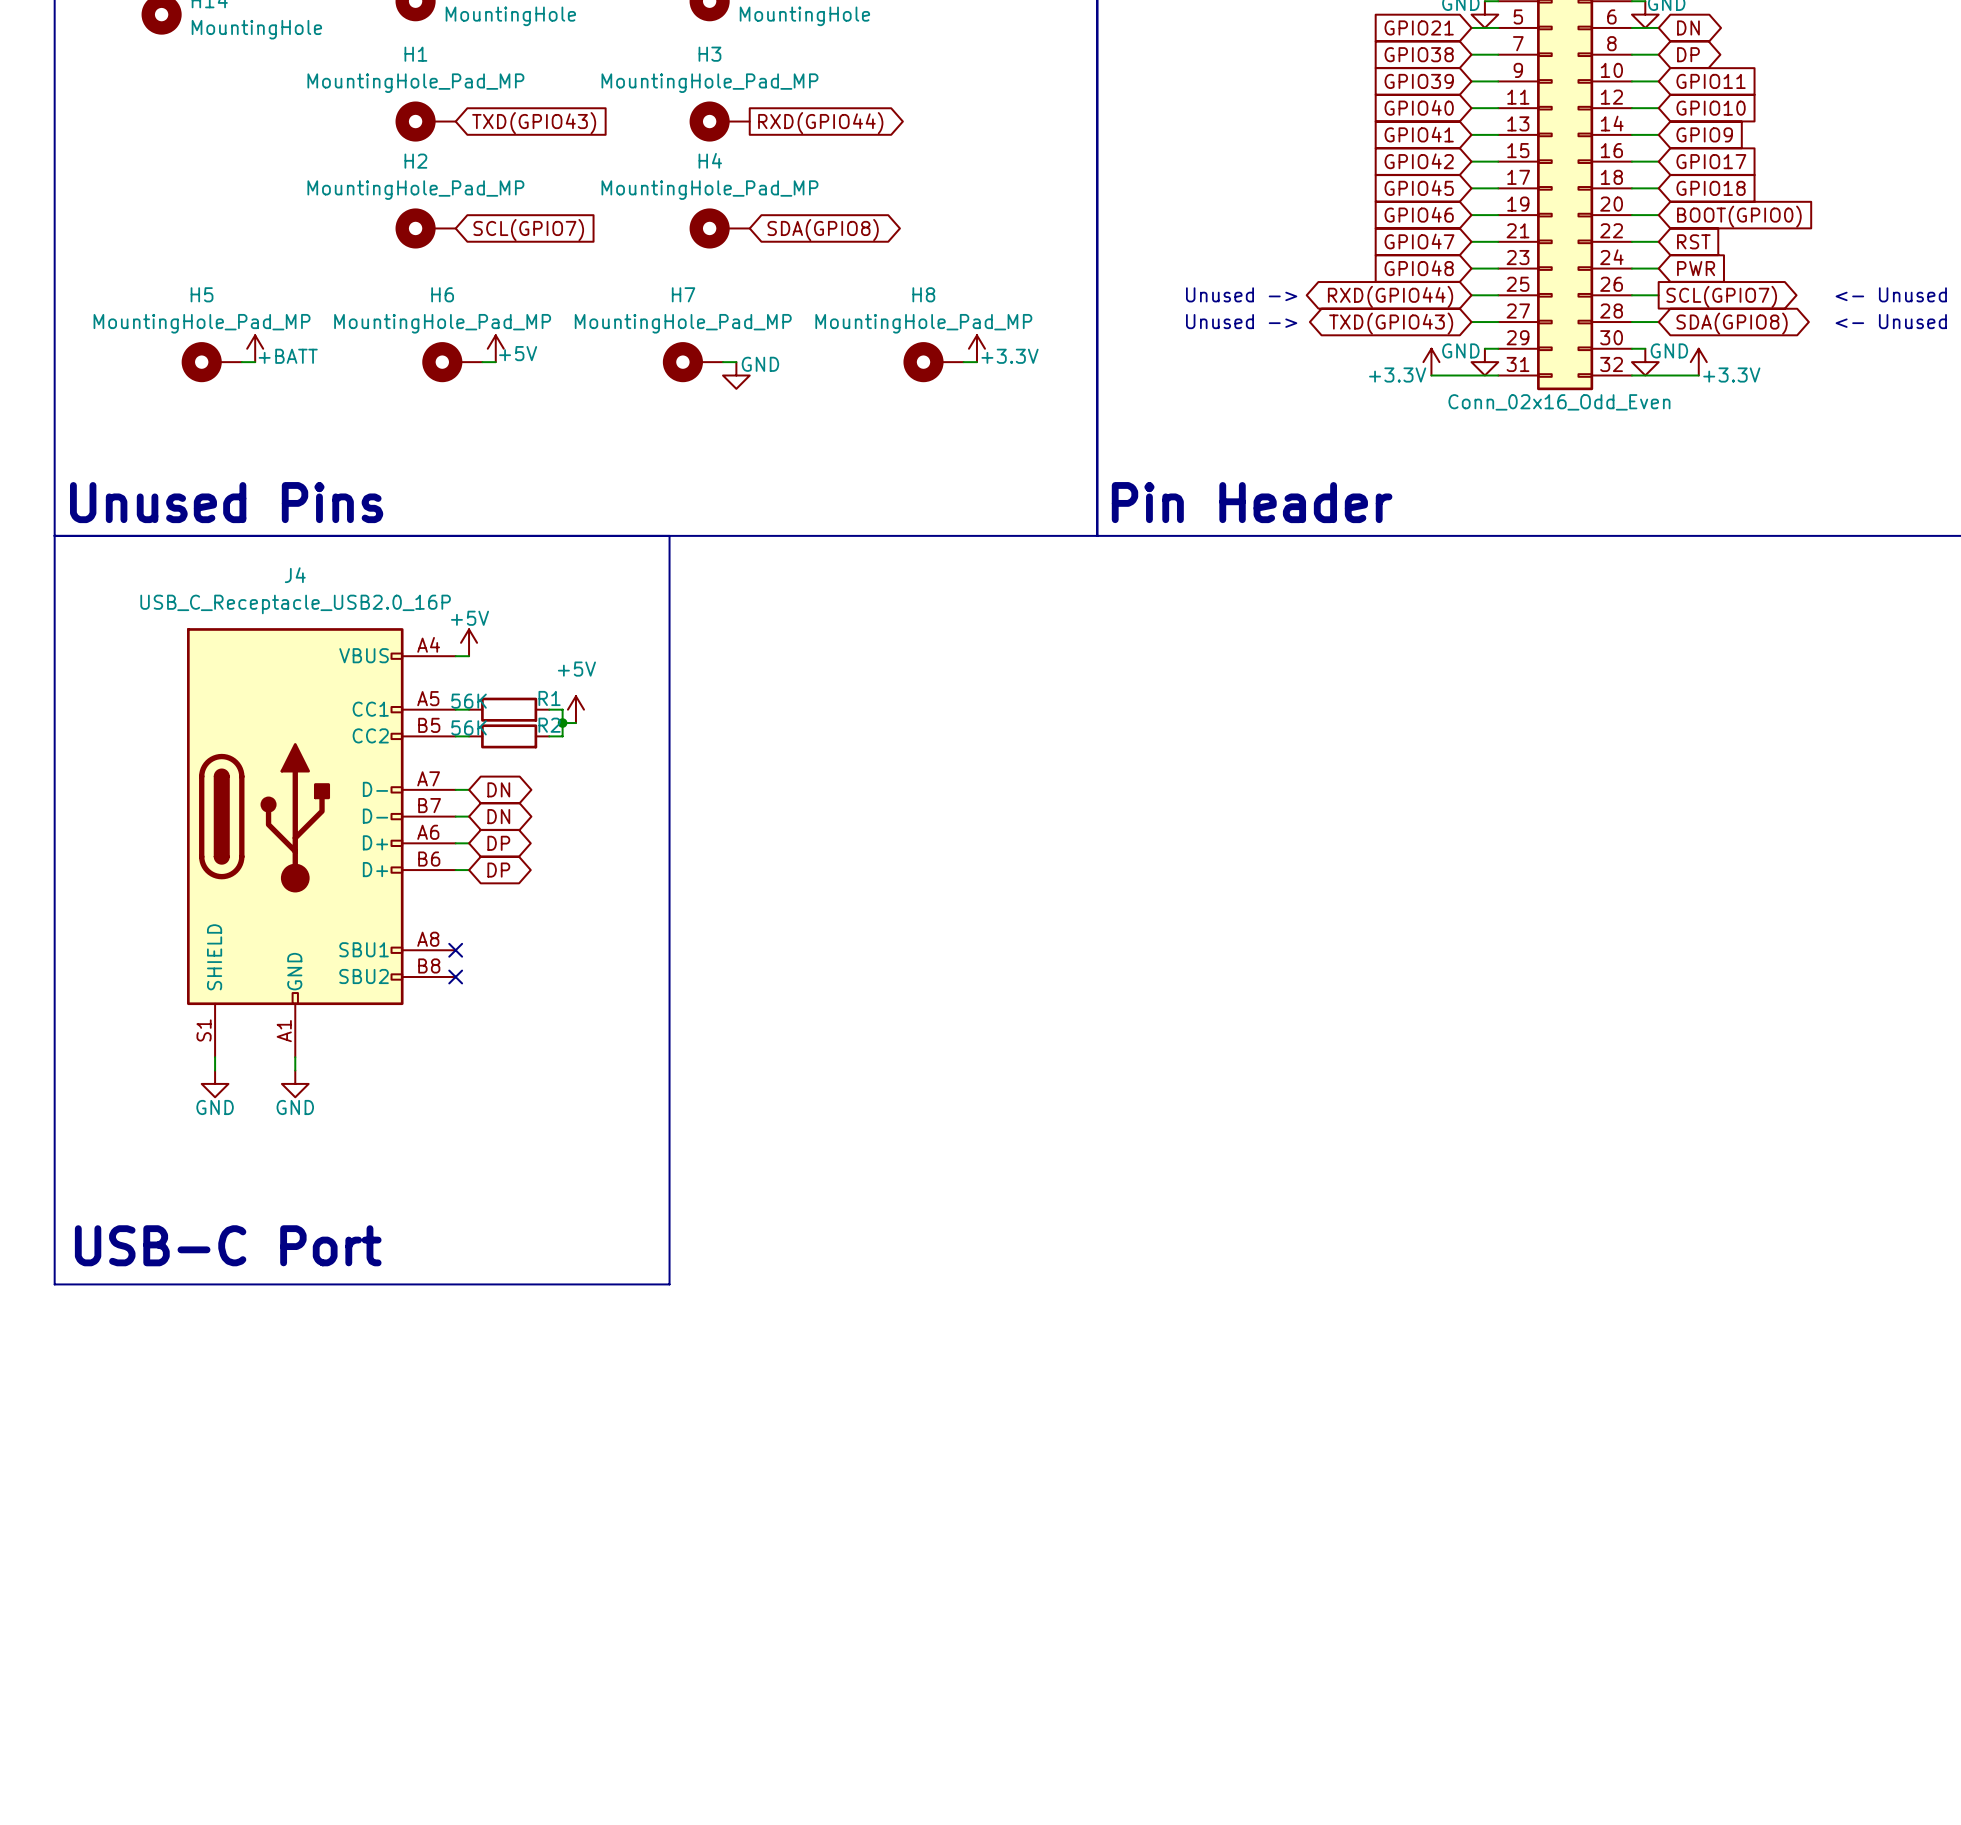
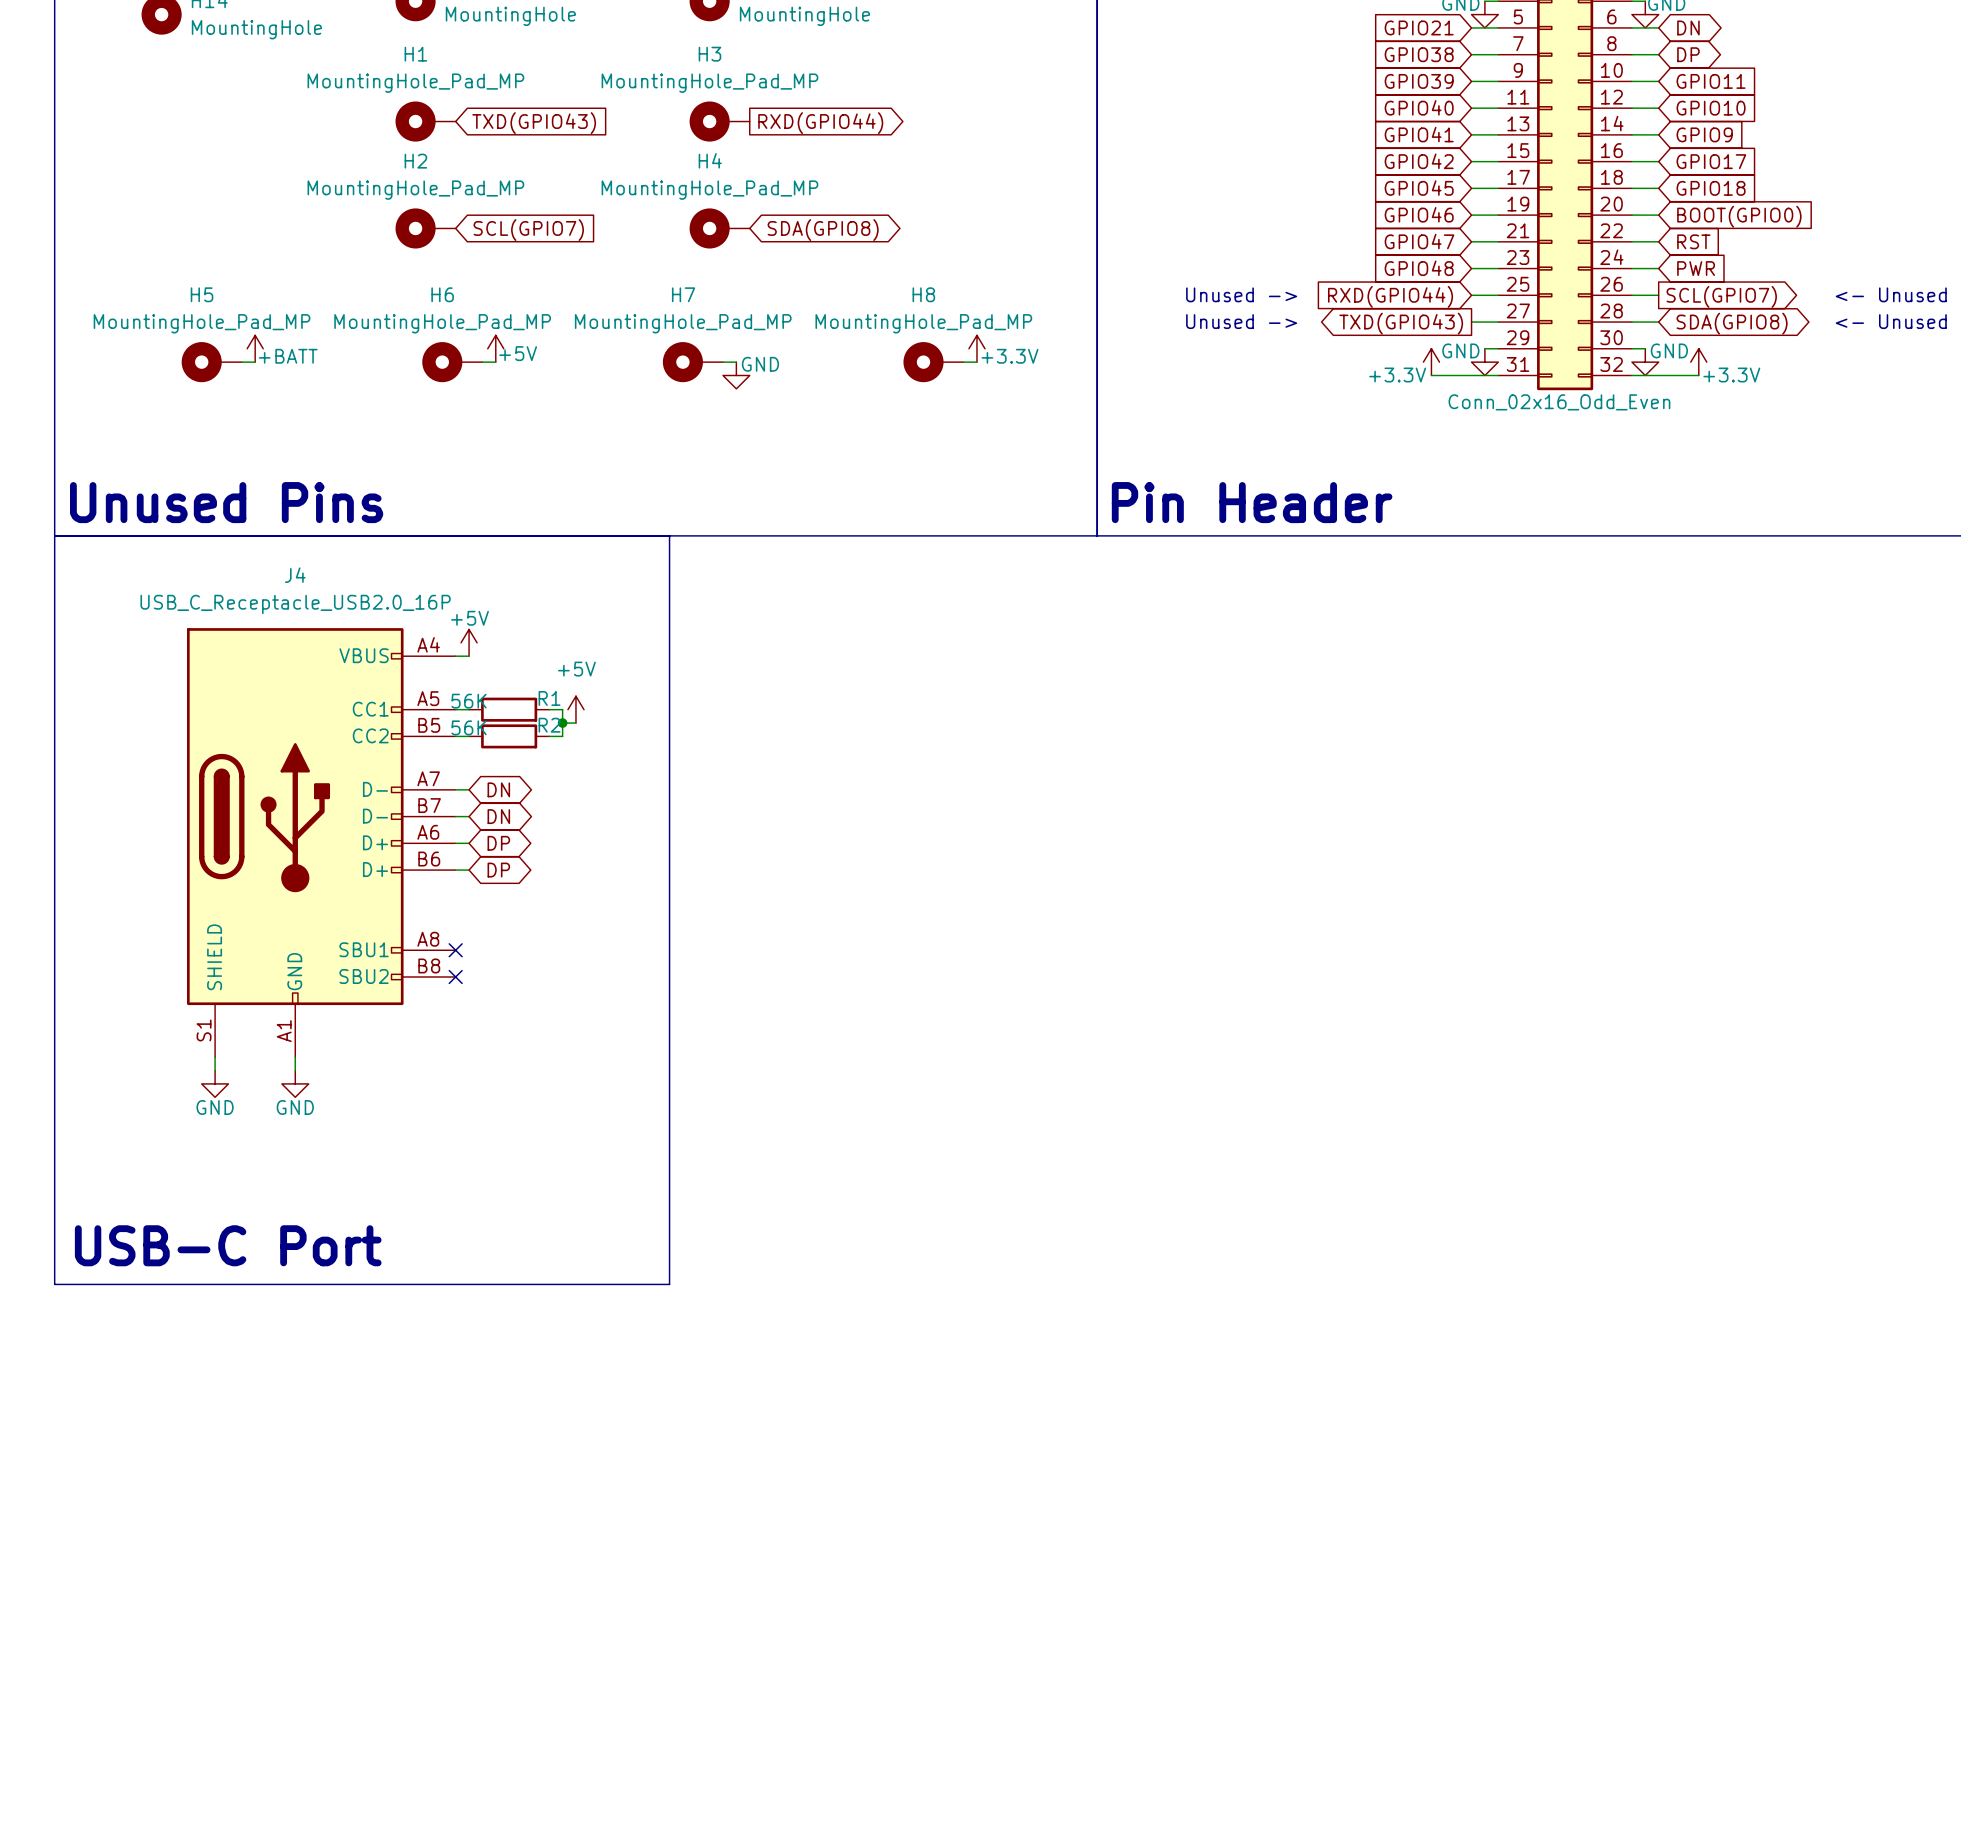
global label shape: bidirectional (1390, 296) -> input (1390, 296)
global label shape: bidirectional (1391, 323) -> output (1401, 323)

